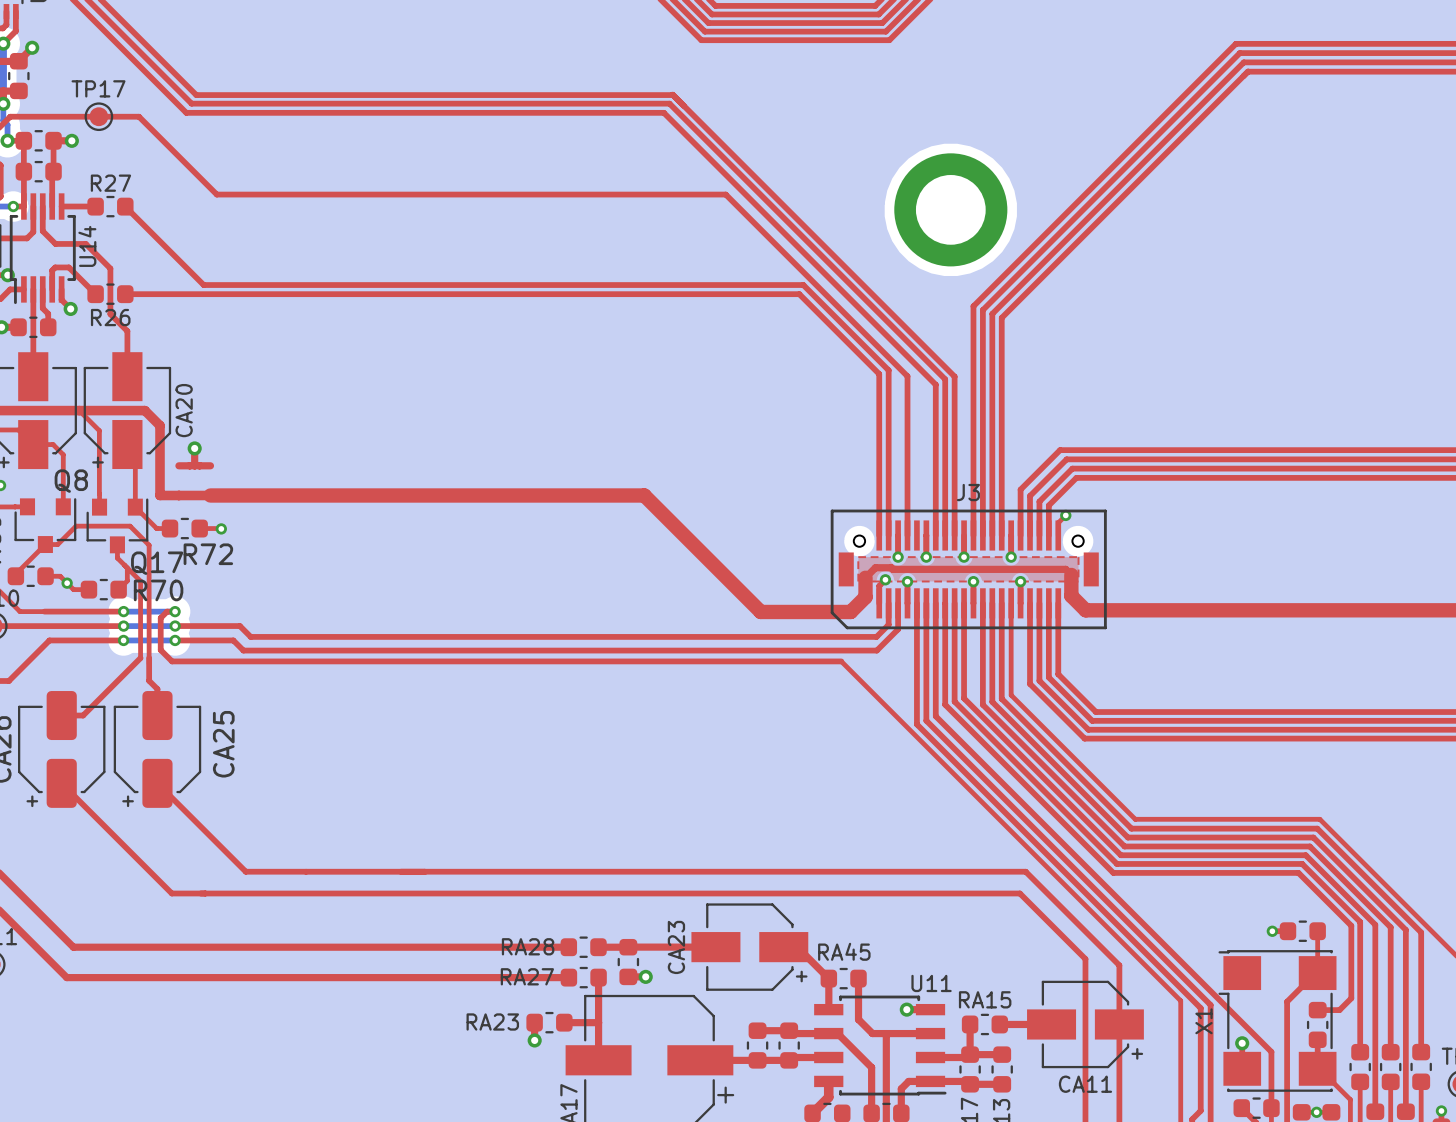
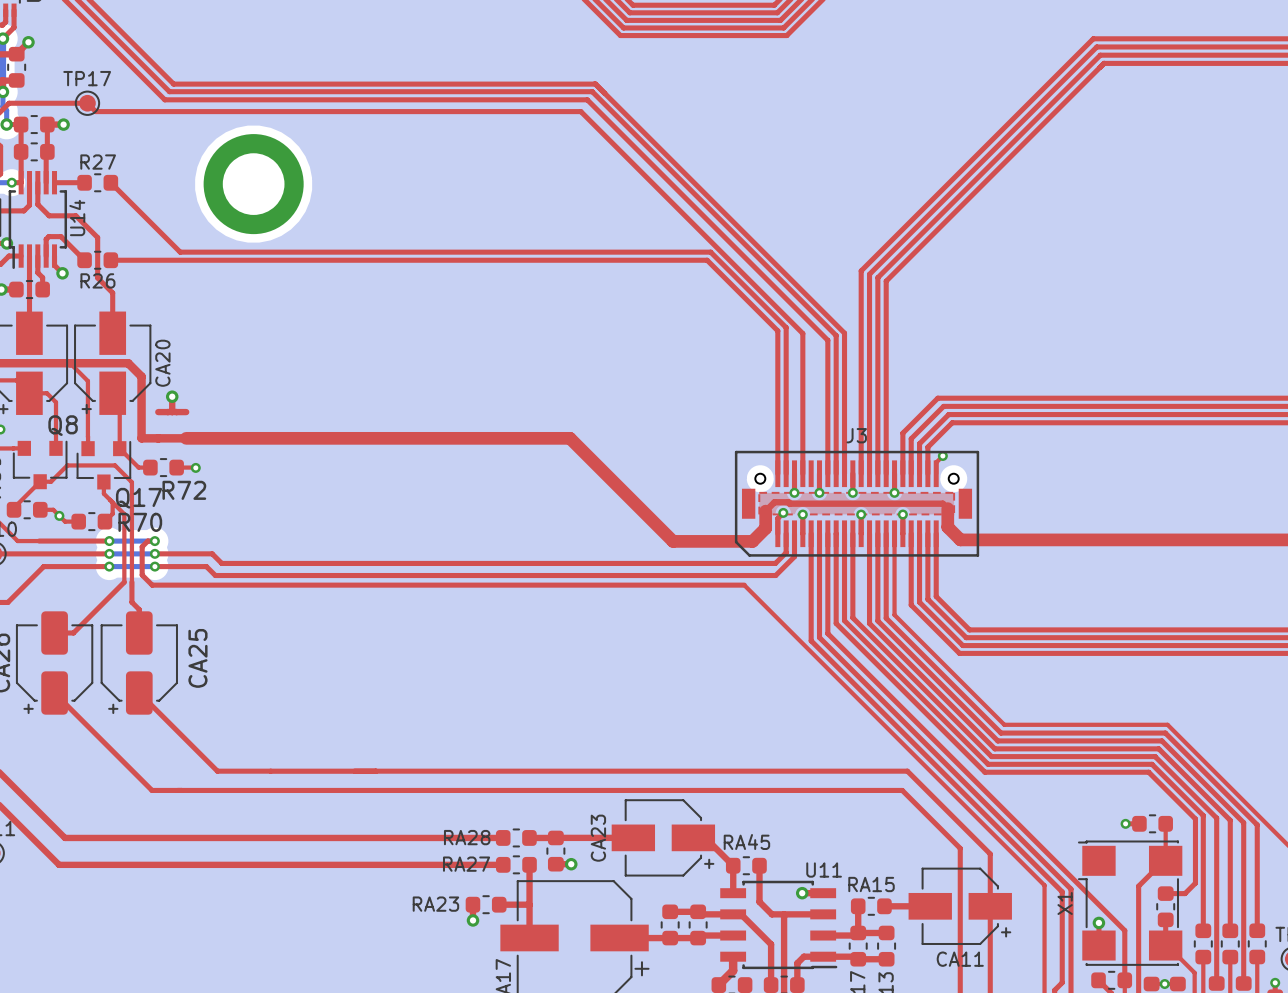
top track: (98, 116) (138, 116) (216, 194) (725, 194) (907, 377) -> (87, 103) (95, 111) (580, 111) (802, 333)
part: none -> (253, 184)
part: (950, 209) -> none

